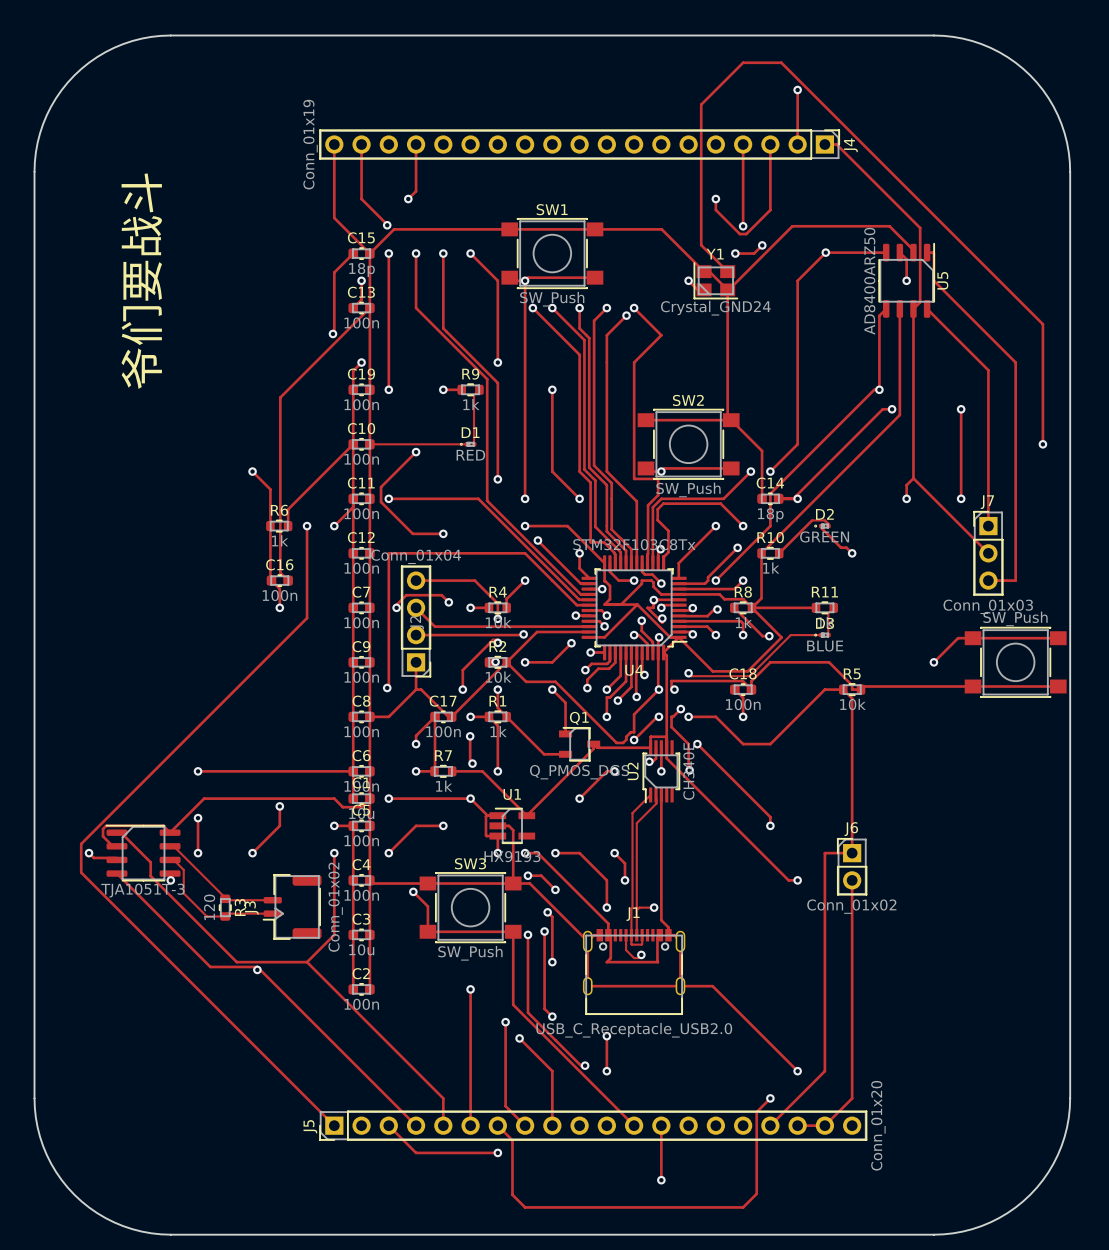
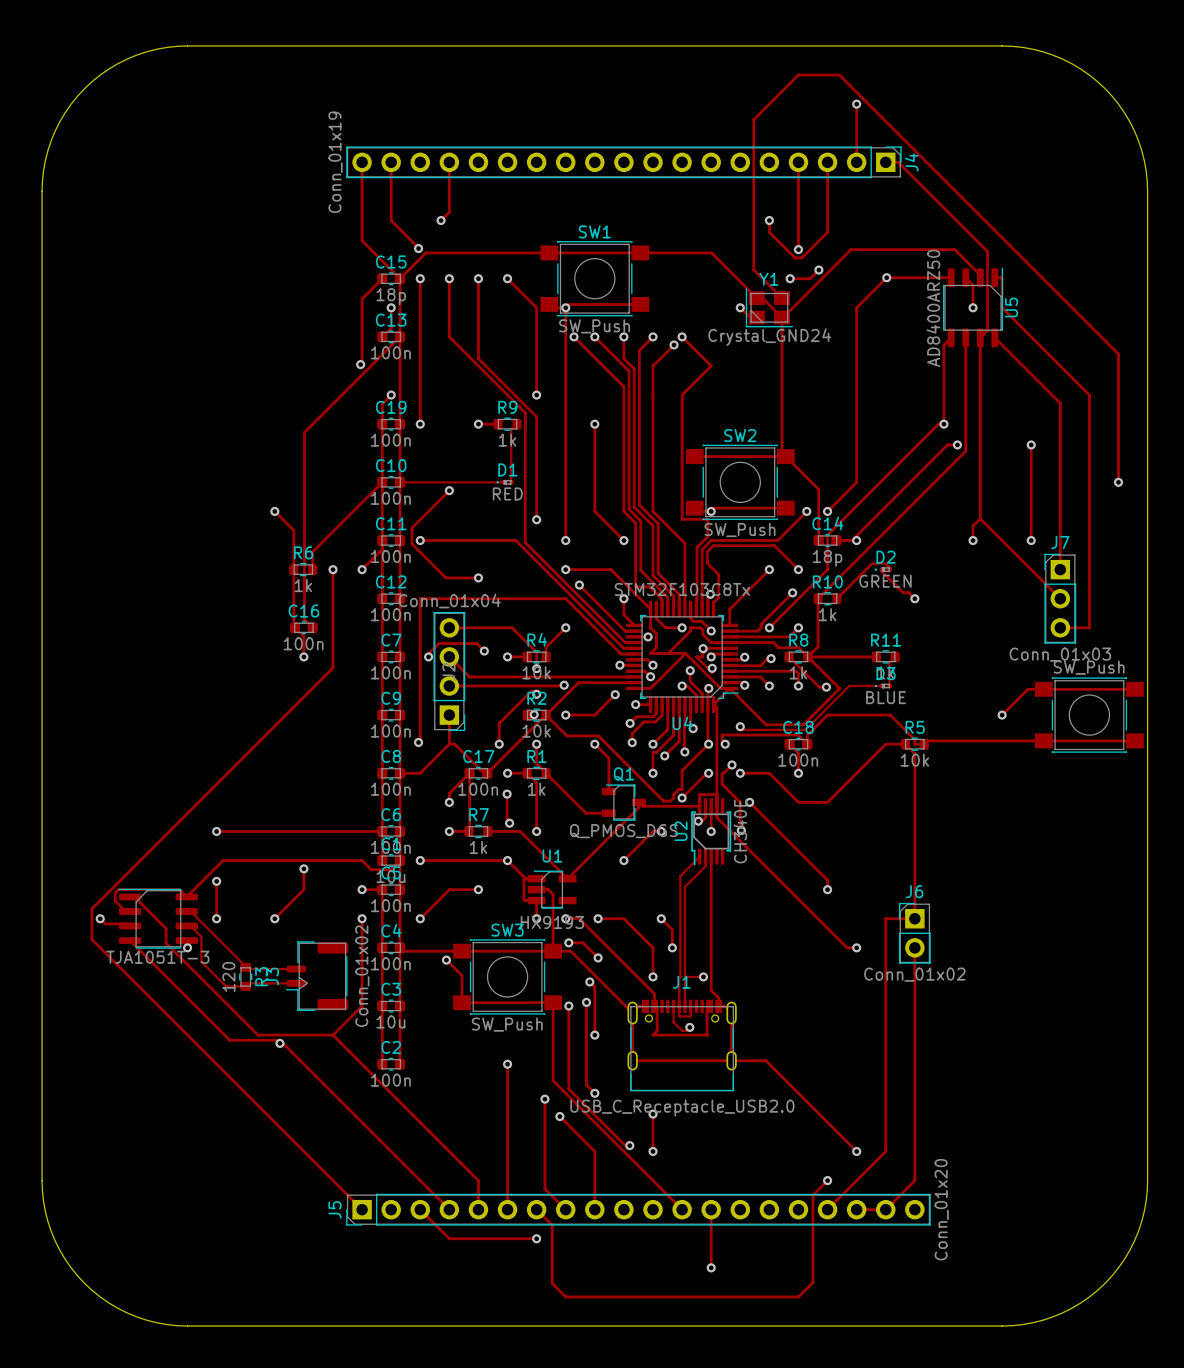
text: 爷们要战斗 (141, 281) -> none

